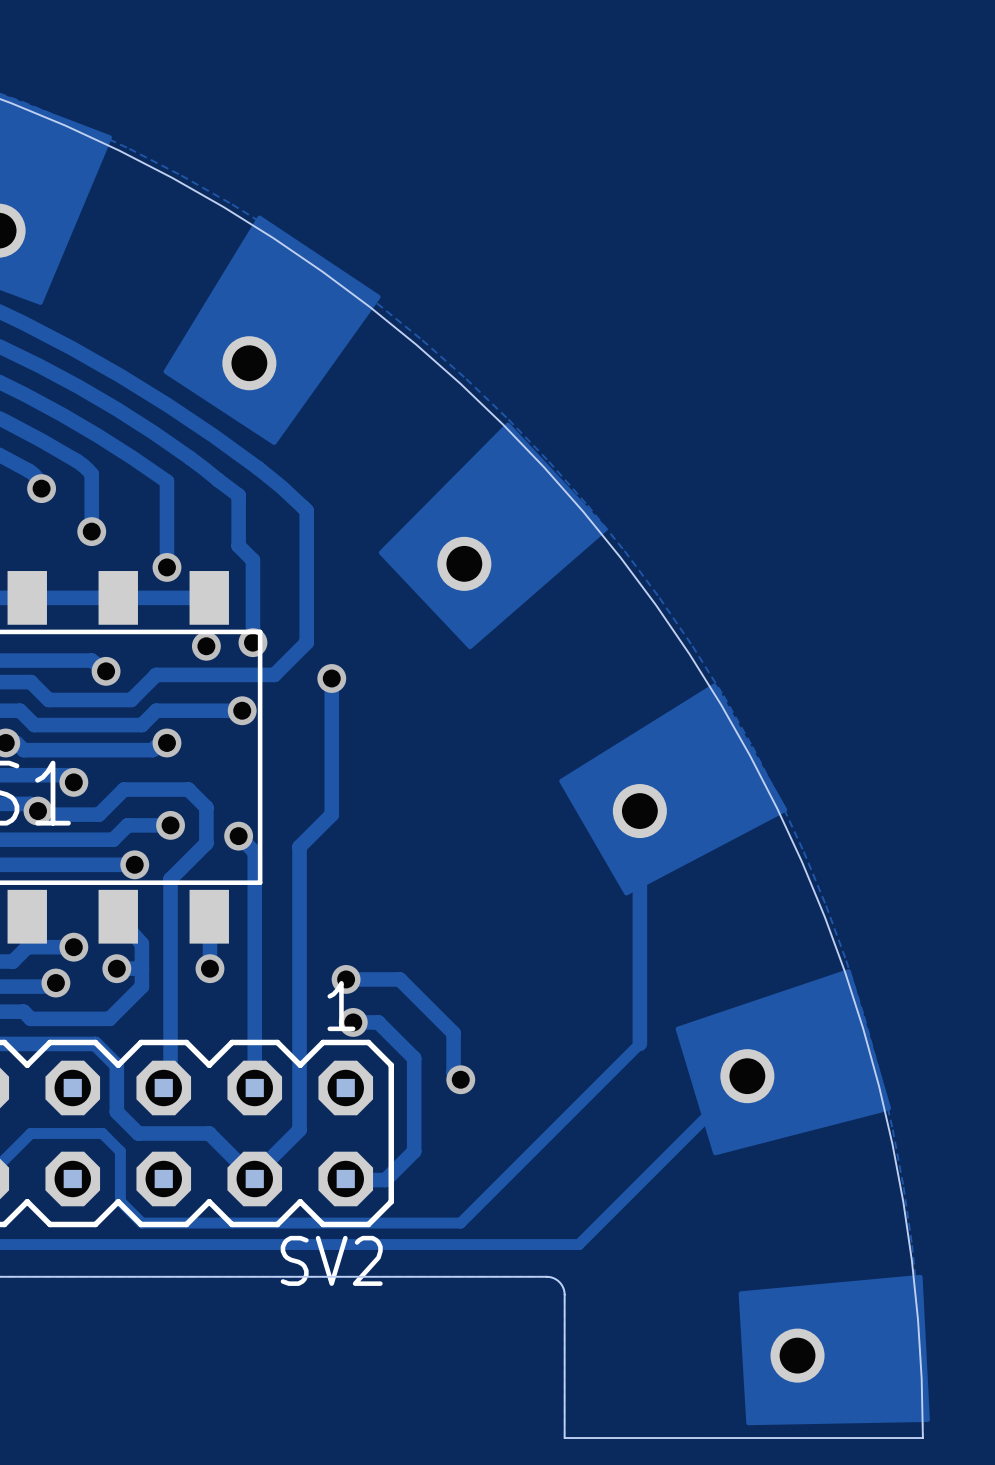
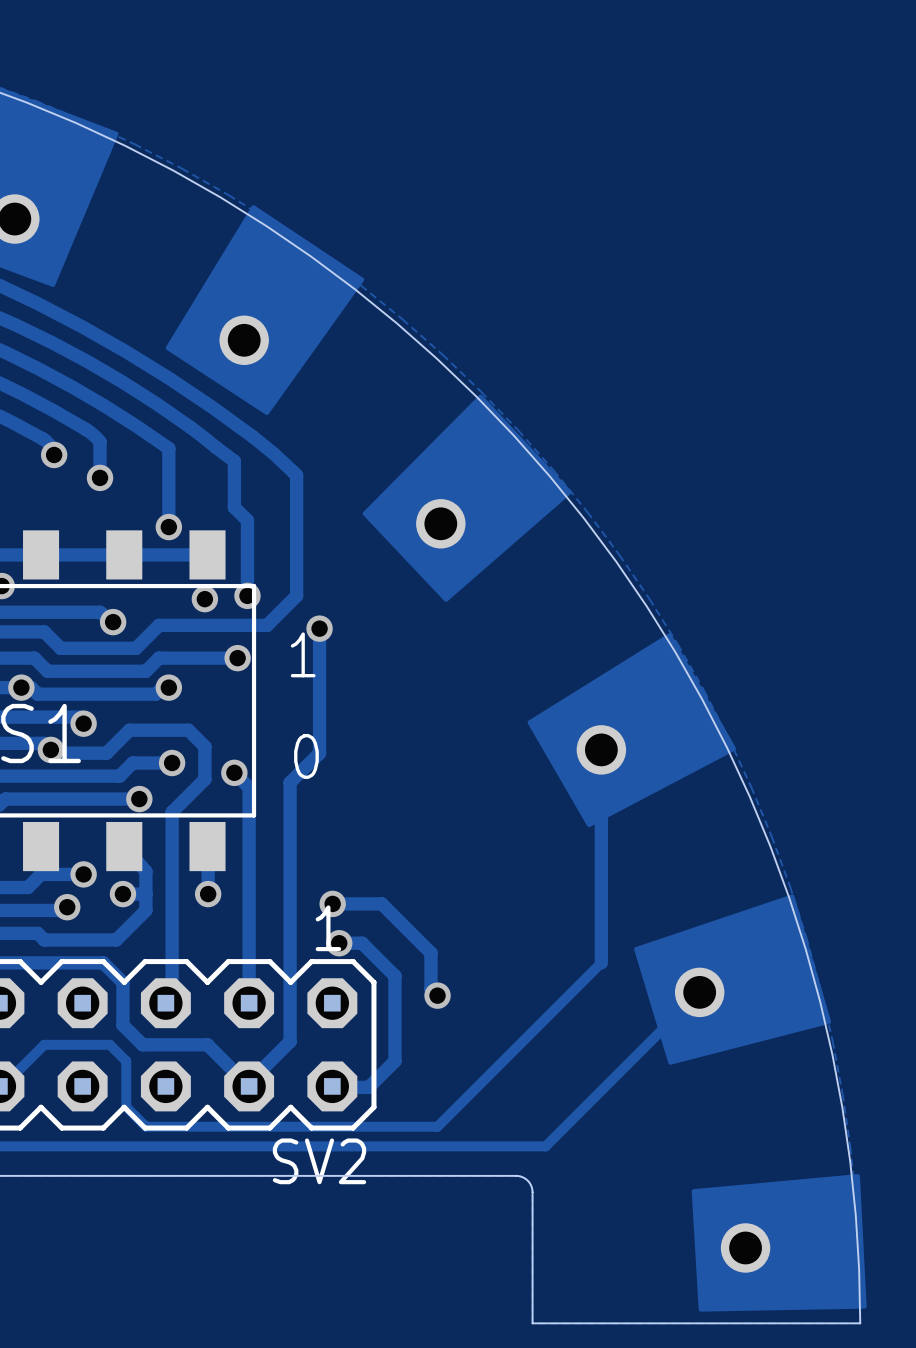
via position: (91, 531) -> (100, 477)
text: none -> 1 (303, 654)
text: none -> 0 (306, 756)

